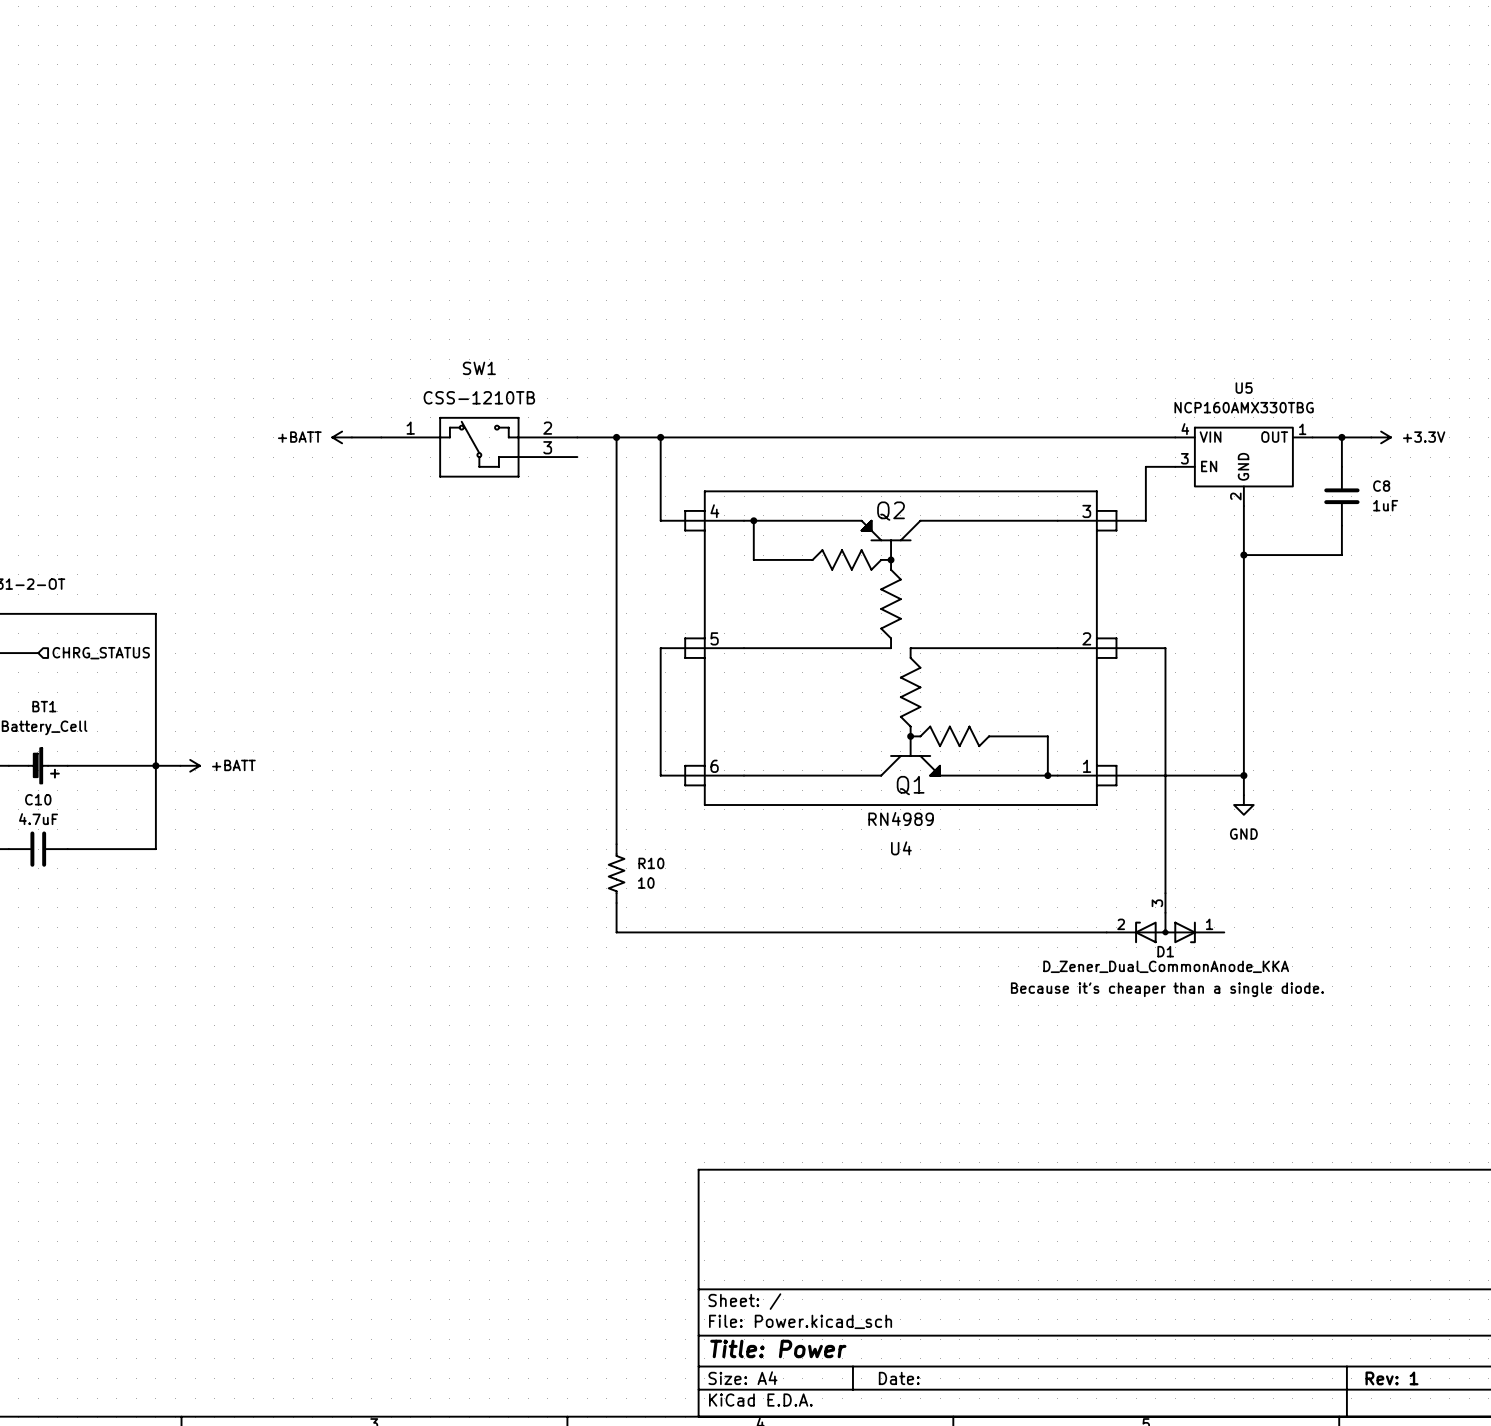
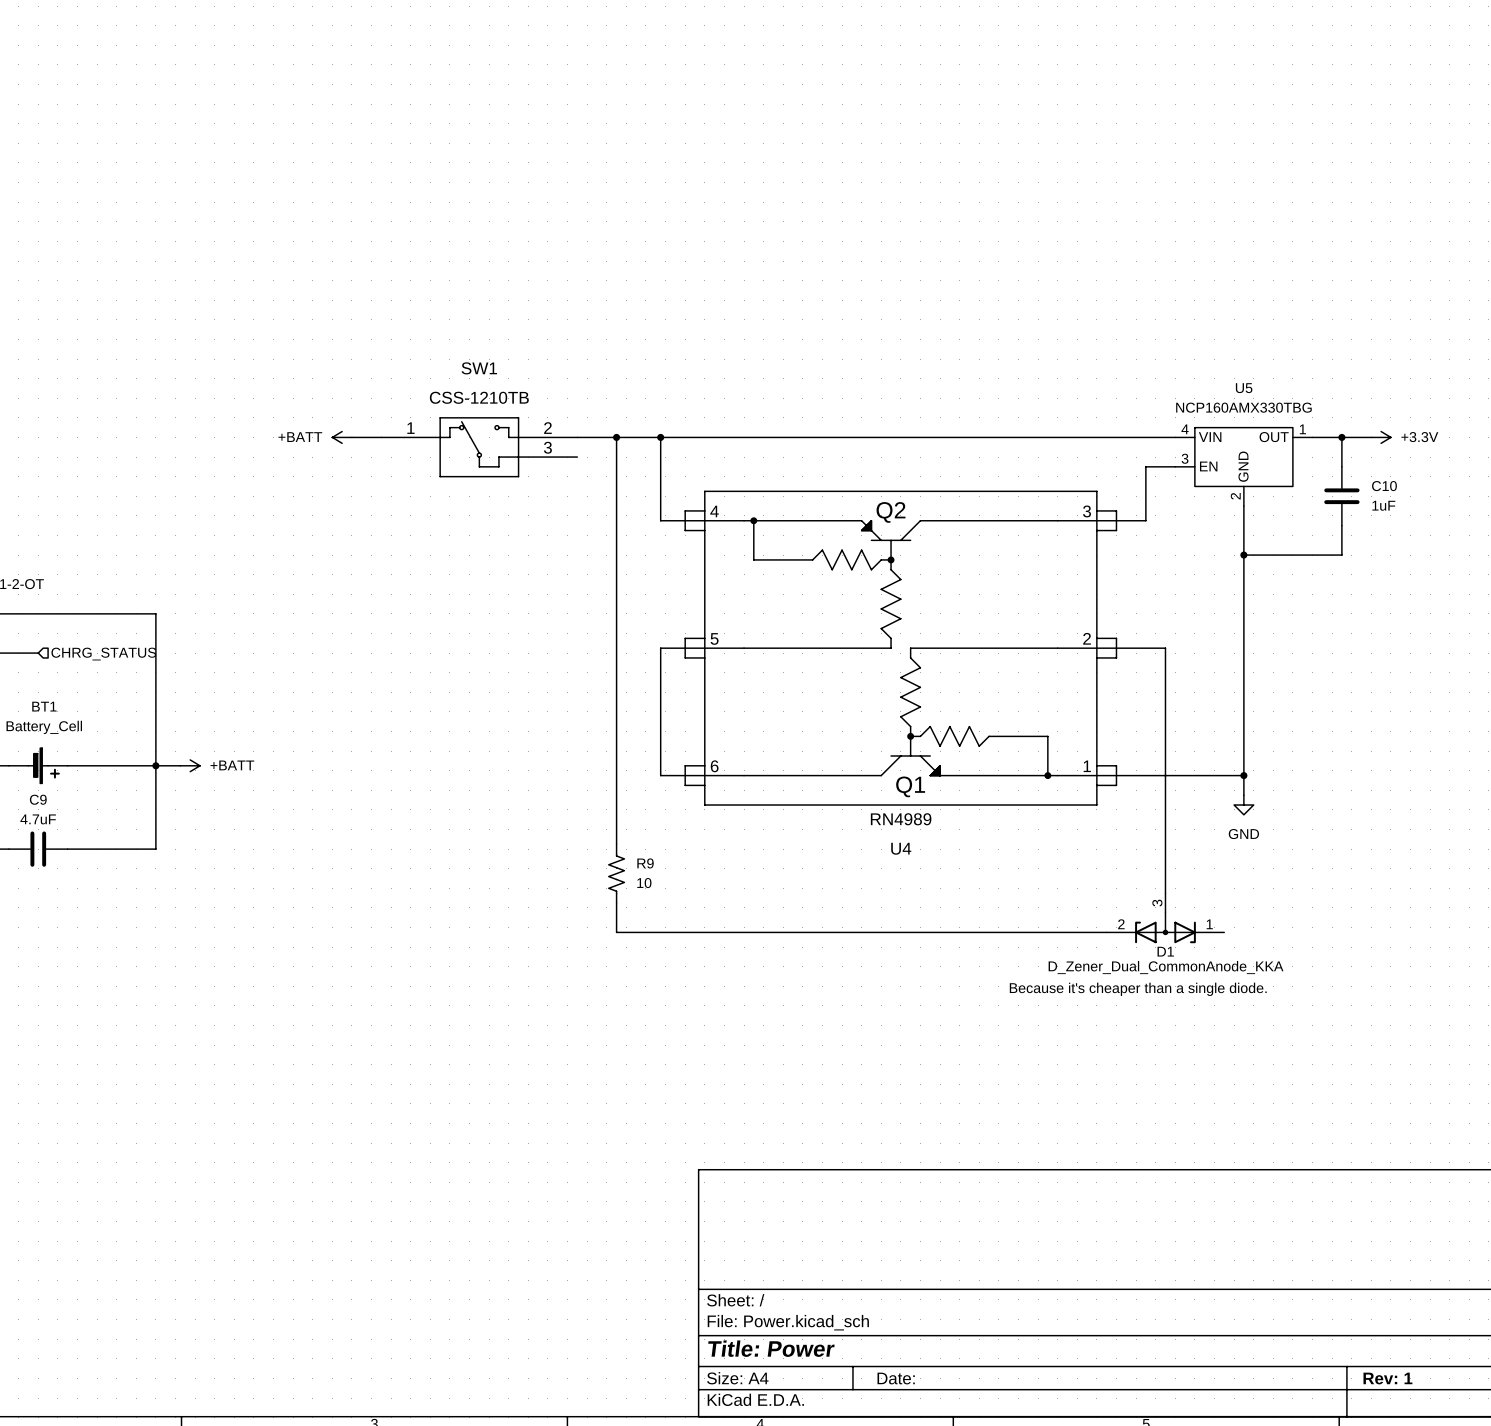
C8 name: C8 (1381, 486) -> C10 (1384, 486)
C10 name: C10 (38, 799) -> C9 (38, 799)
R10 name: R10 (651, 863) -> R9 (645, 863)

